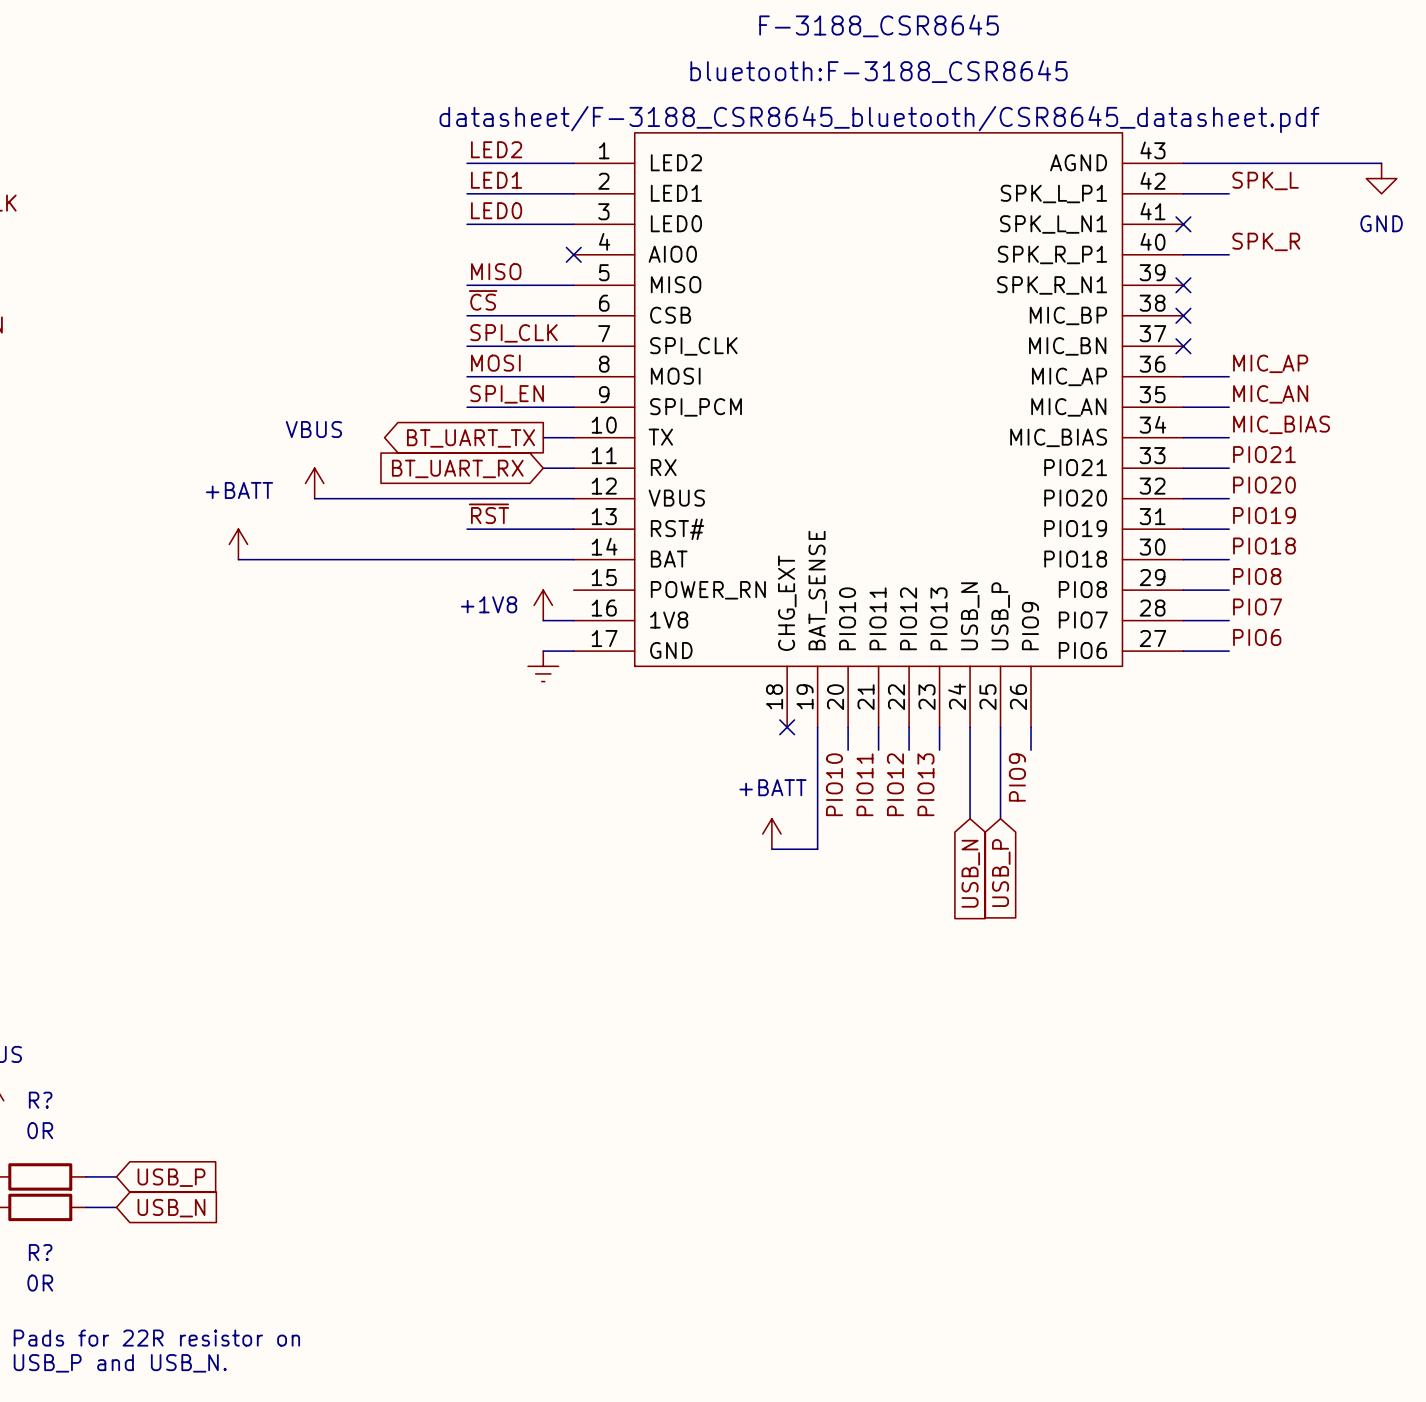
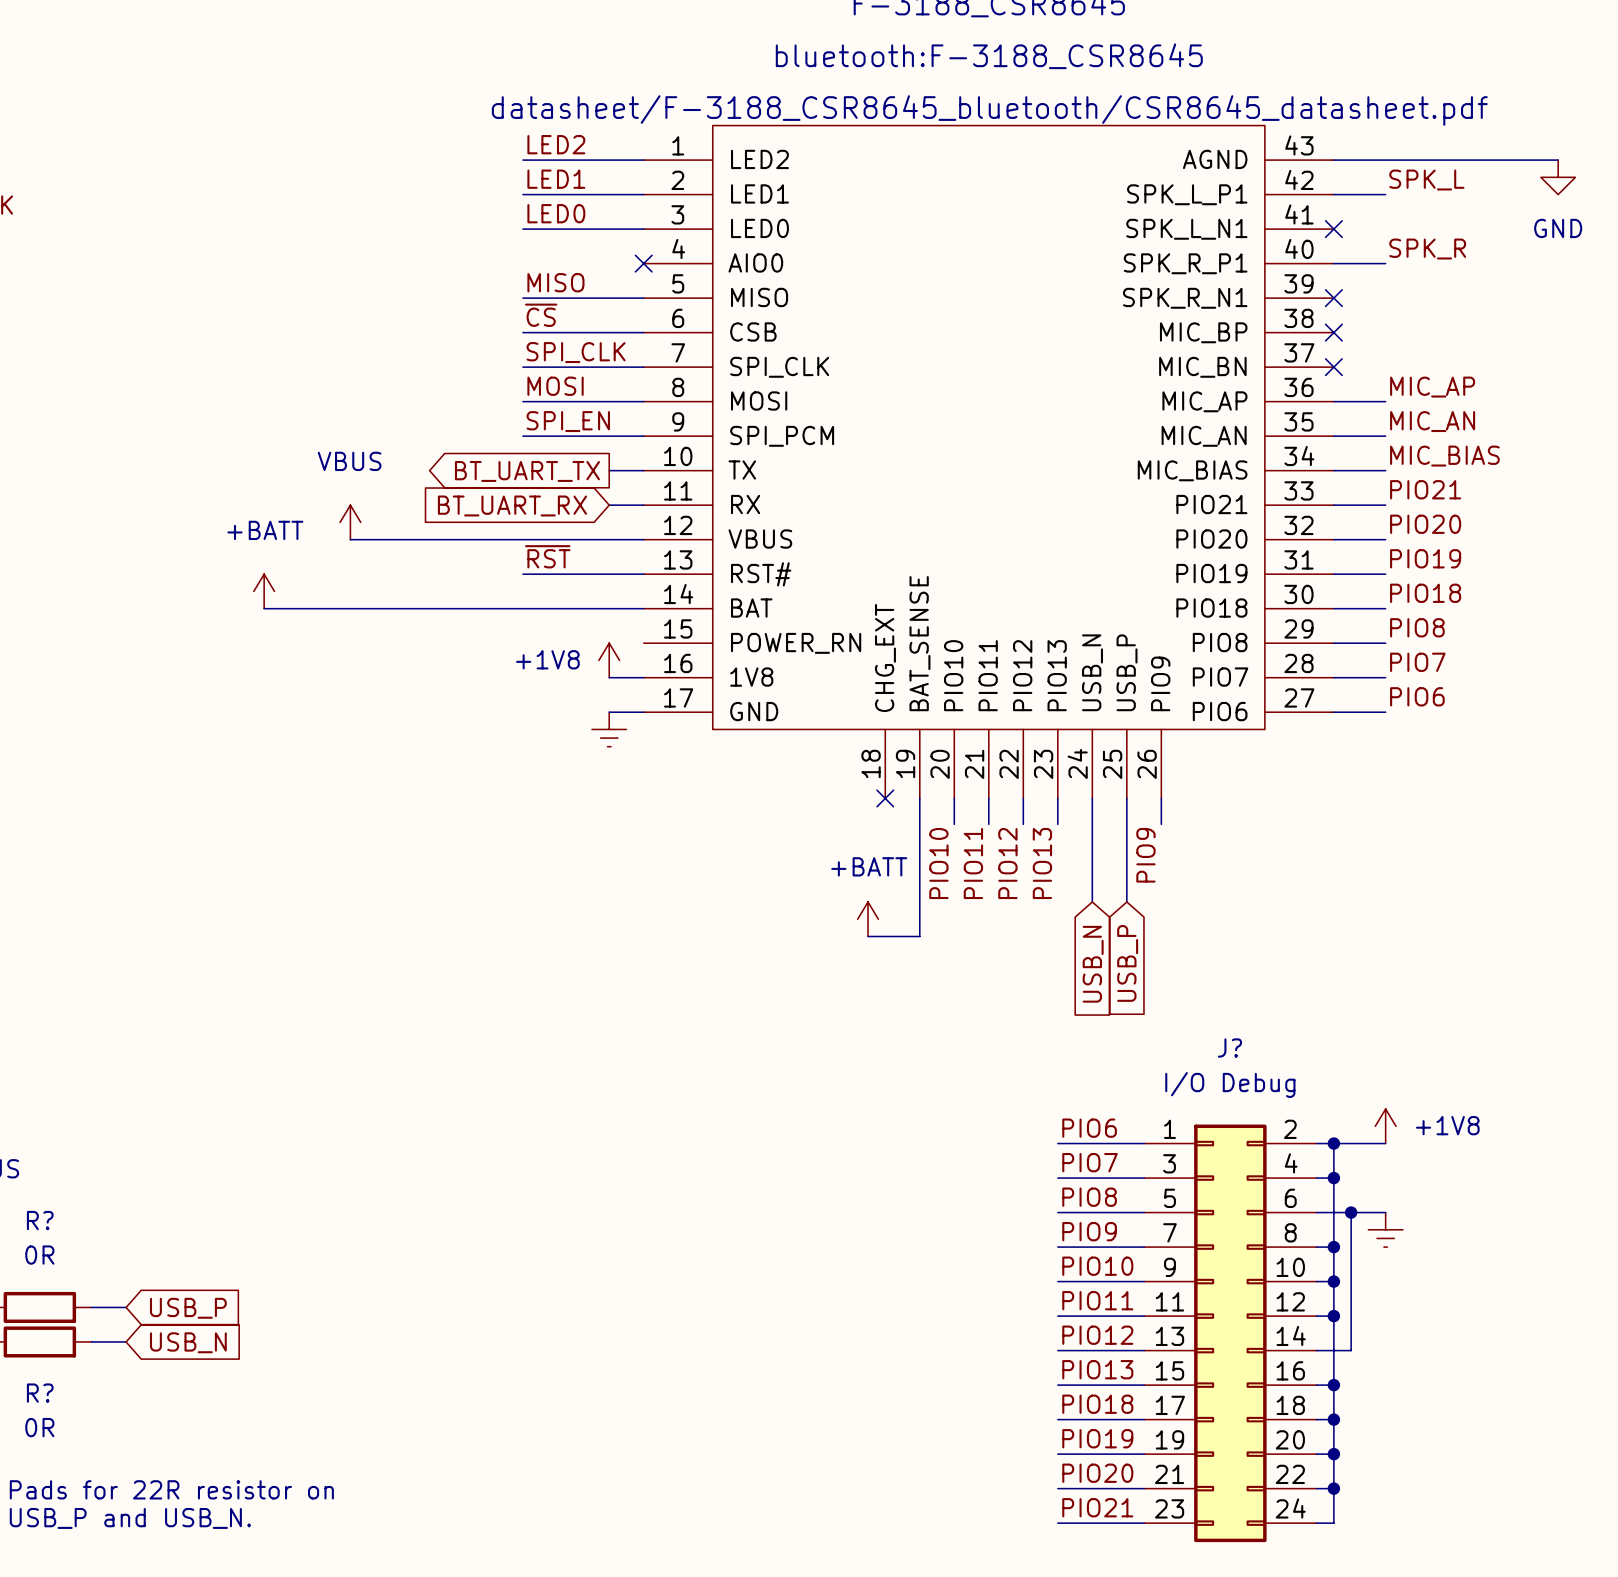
power symbol: none -> +1V8 (1385, 1126)
label: none -> PIO6 (1089, 1128)
wire: none -> (1057, 1143) (1144, 1143)
wire: none -> (1316, 1143) (1385, 1143)
wire: none -> (1333, 1143) (1333, 1523) (1316, 1523)
junction: none -> (1333, 1143)
label: none -> PIO7 (1089, 1162)
wire: none -> (1057, 1178) (1144, 1178)
wire: none -> (1316, 1178) (1333, 1178)
junction: none -> (1333, 1178)
label: none -> PIO8 (1089, 1197)
wire: none -> (1057, 1212) (1144, 1212)
wire: none -> (1316, 1212) (1385, 1212)
wire: none -> (1351, 1212) (1351, 1350) (1316, 1350)
junction: none -> (1351, 1212)
power symbol: none -> (1385, 1229)
label: none -> PIO9 (1089, 1231)
wire: none -> (1057, 1247) (1144, 1247)
wire: none -> (1316, 1247) (1333, 1247)
junction: none -> (1333, 1247)
label: none -> PIO10 (1097, 1266)
wire: none -> (1057, 1281) (1144, 1281)
wire: none -> (1316, 1281) (1333, 1281)
junction: none -> (1333, 1281)
label: none -> PIO11 (1097, 1300)
wire: none -> (1057, 1316) (1144, 1316)
wire: none -> (1316, 1316) (1333, 1316)
junction: none -> (1333, 1316)
J?: none -> I/O Debug (1230, 1333)
label: none -> PIO12 (1097, 1335)
wire: none -> (1057, 1350) (1144, 1350)
label: none -> PIO13 (1097, 1369)
wire: none -> (1057, 1385) (1144, 1385)
wire: none -> (1316, 1385) (1333, 1385)
junction: none -> (1333, 1385)
label: none -> PIO18 (1097, 1404)
wire: none -> (1057, 1419) (1144, 1419)
wire: none -> (1316, 1419) (1333, 1419)
junction: none -> (1333, 1419)
label: none -> PIO19 (1097, 1438)
wire: none -> (1057, 1454) (1144, 1454)
wire: none -> (1316, 1454) (1333, 1454)
junction: none -> (1333, 1454)
label: none -> PIO20 (1097, 1473)
wire: none -> (1057, 1488) (1144, 1488)
wire: none -> (1316, 1488) (1333, 1488)
junction: none -> (1333, 1488)
label: none -> PIO21 (1097, 1507)
wire: none -> (1057, 1523) (1144, 1523)

